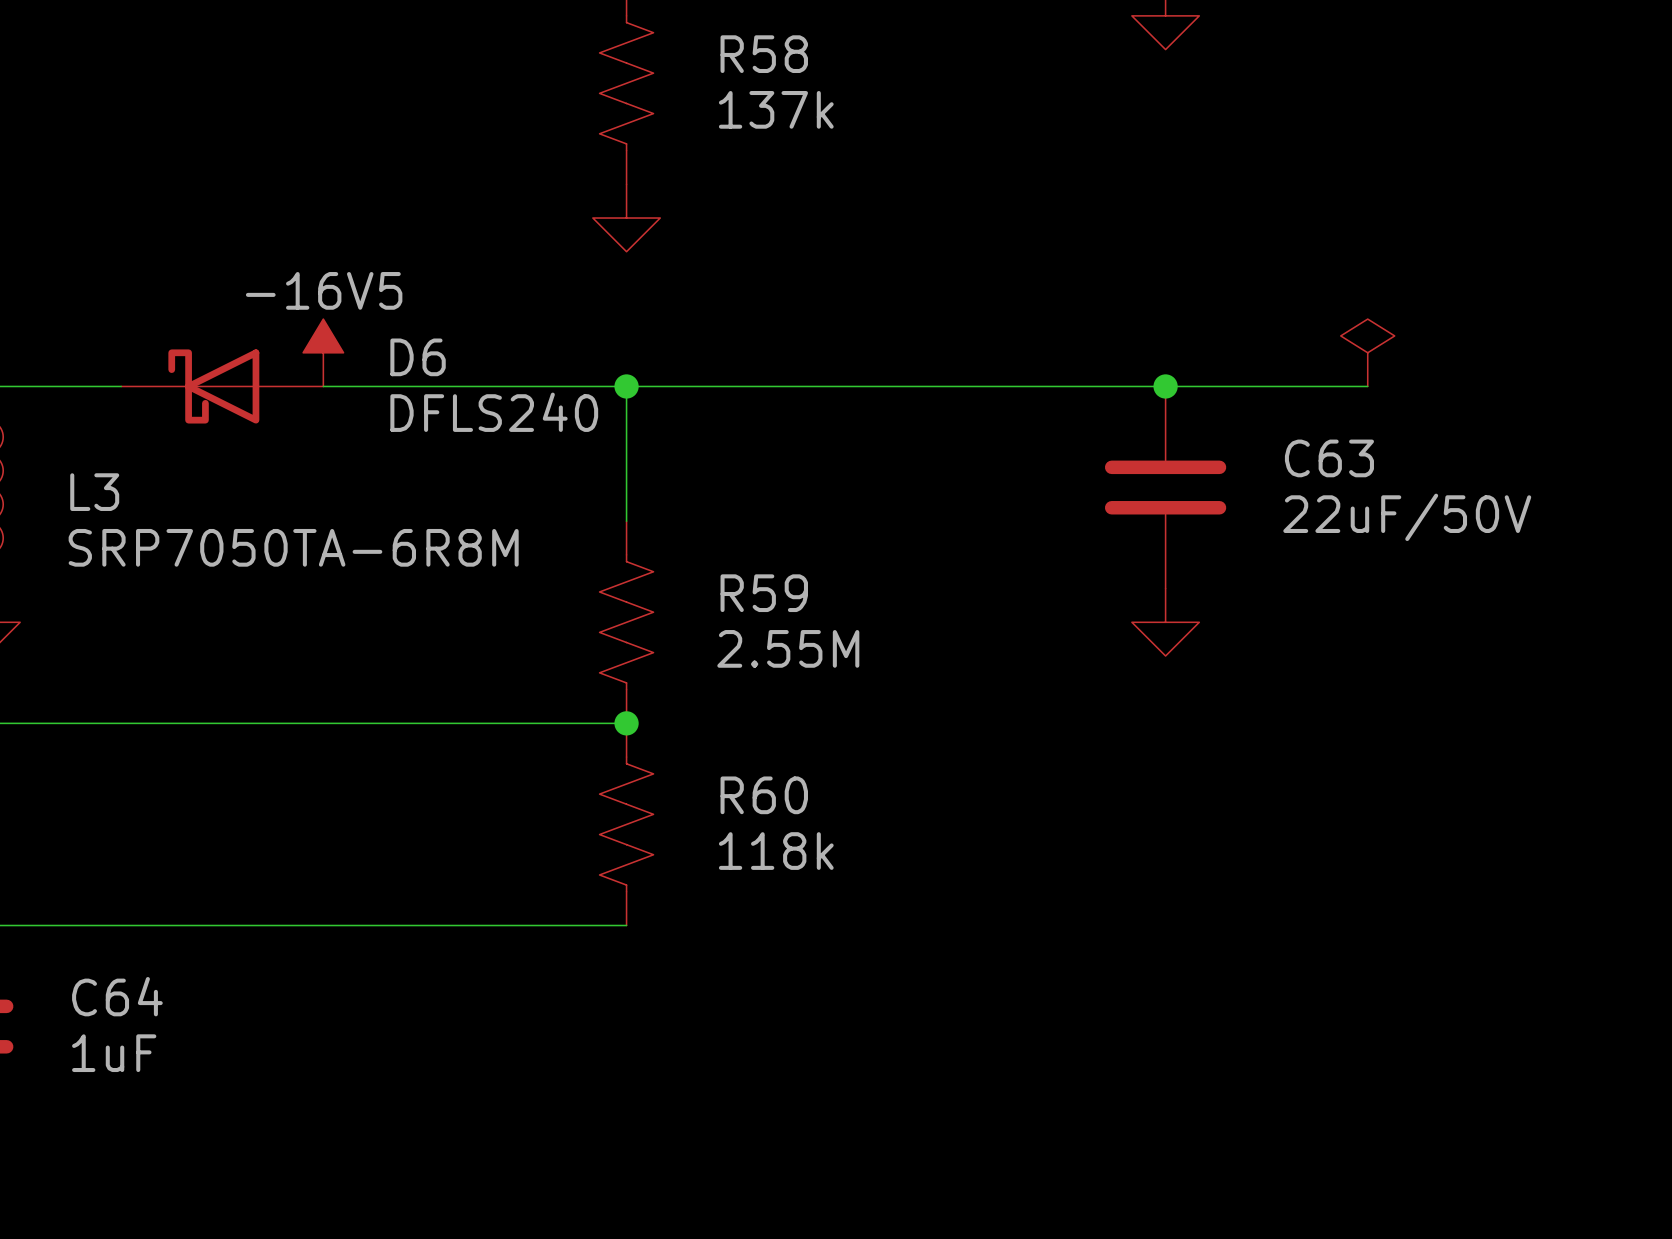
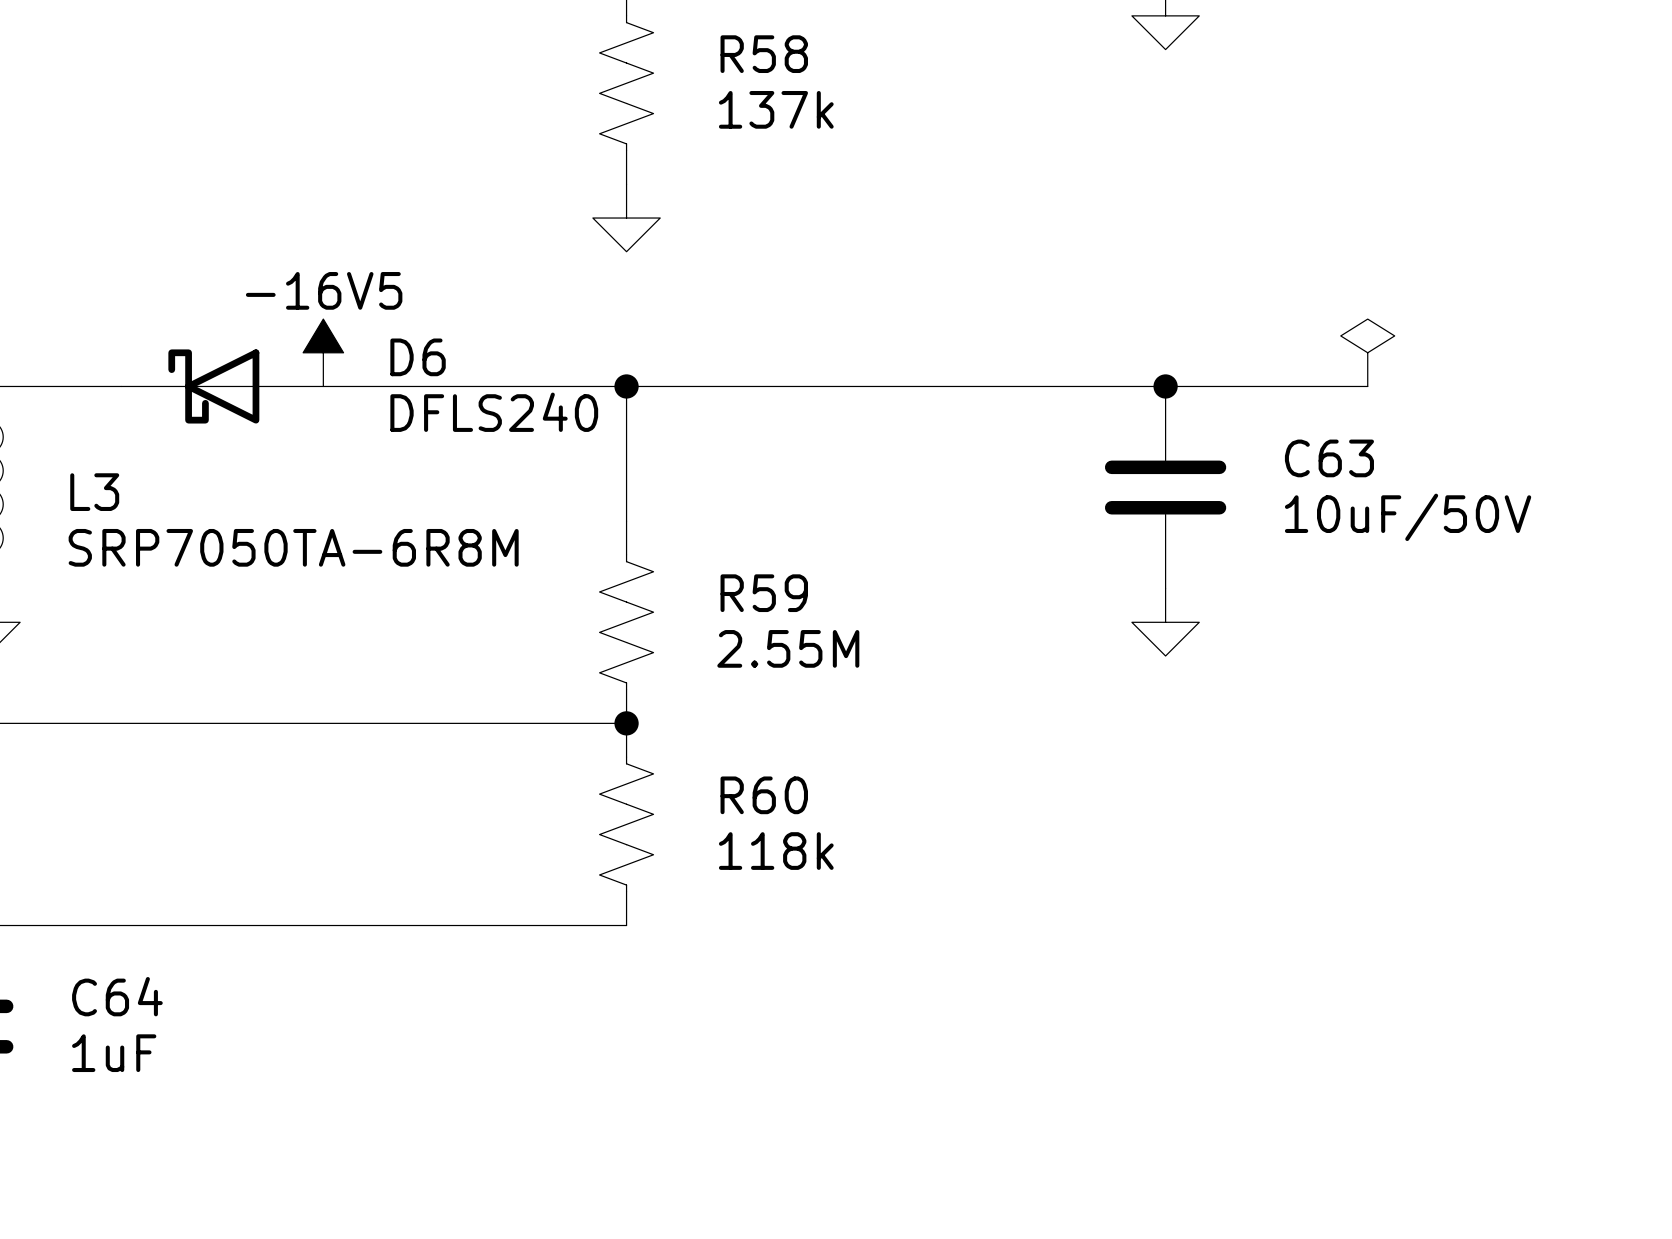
C63 value: 22uF/50V (1407, 517) -> 10uF/50V (1408, 517)

